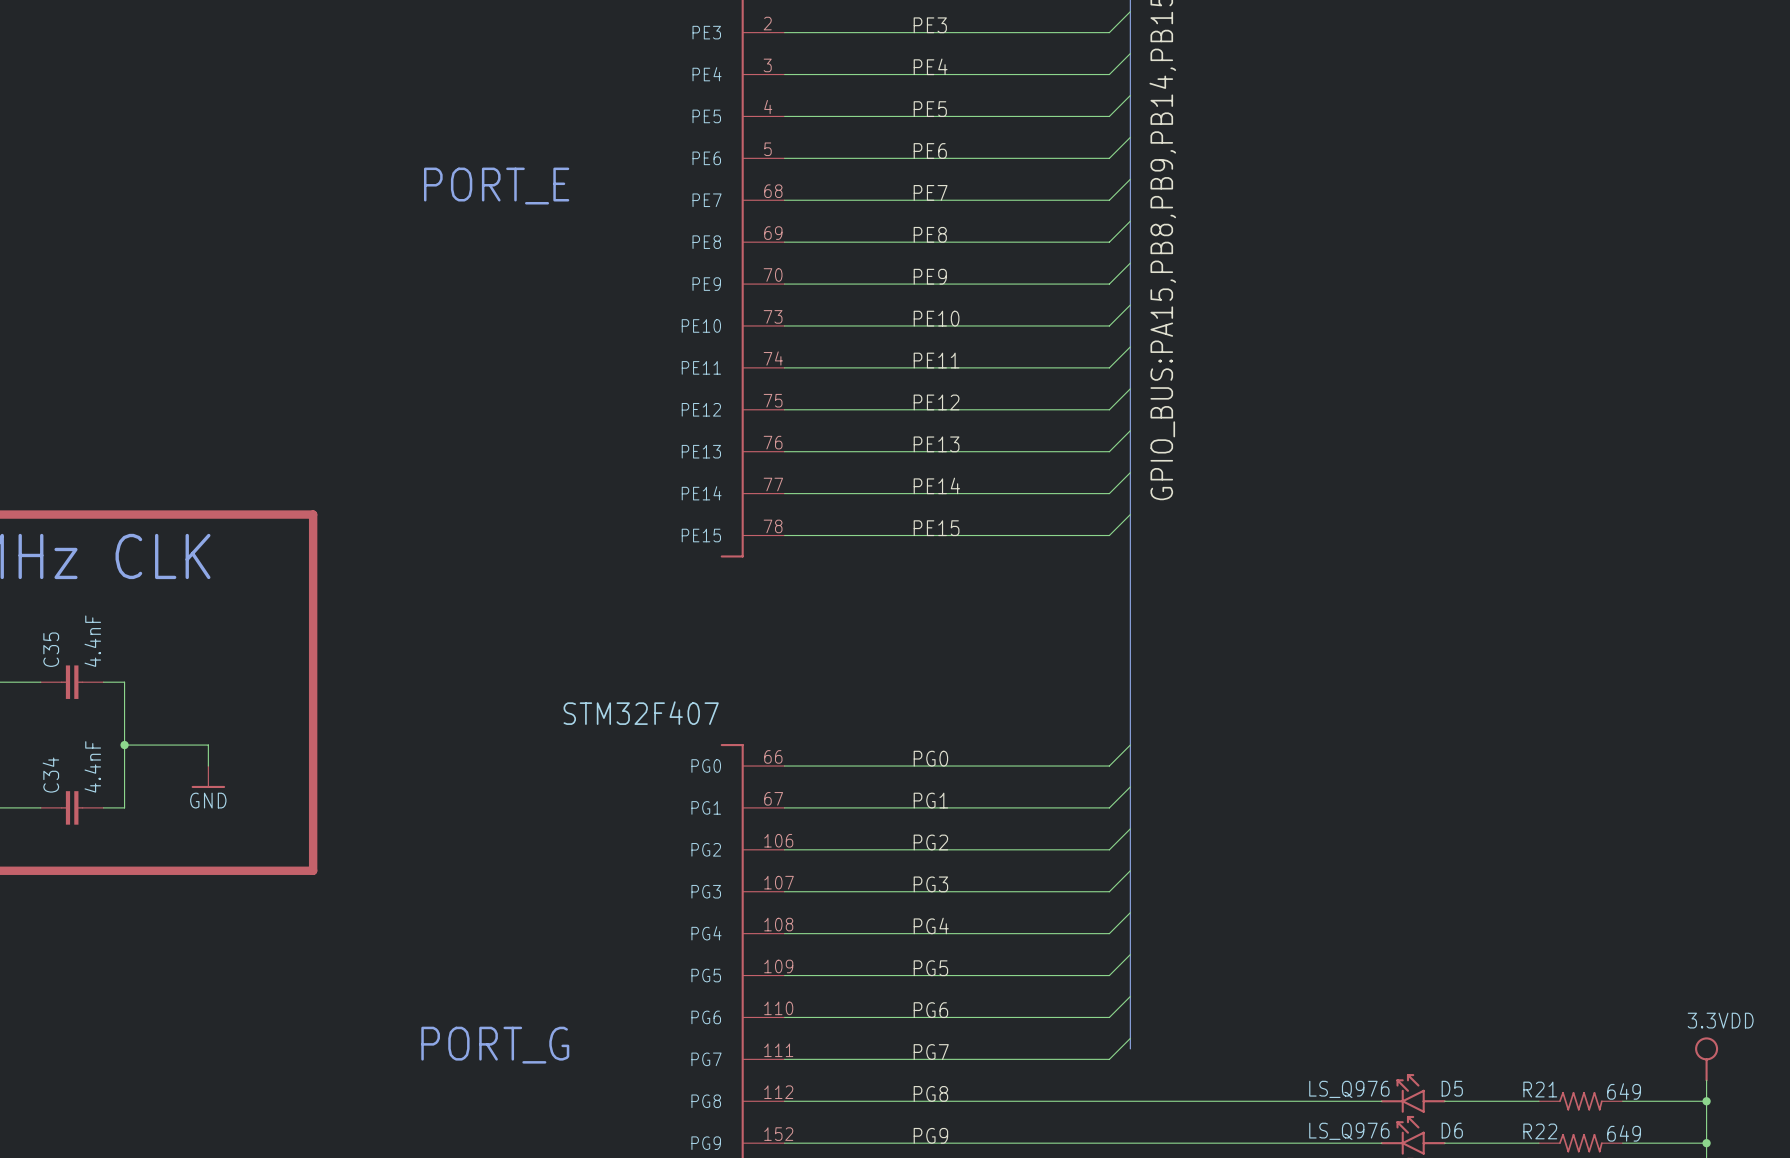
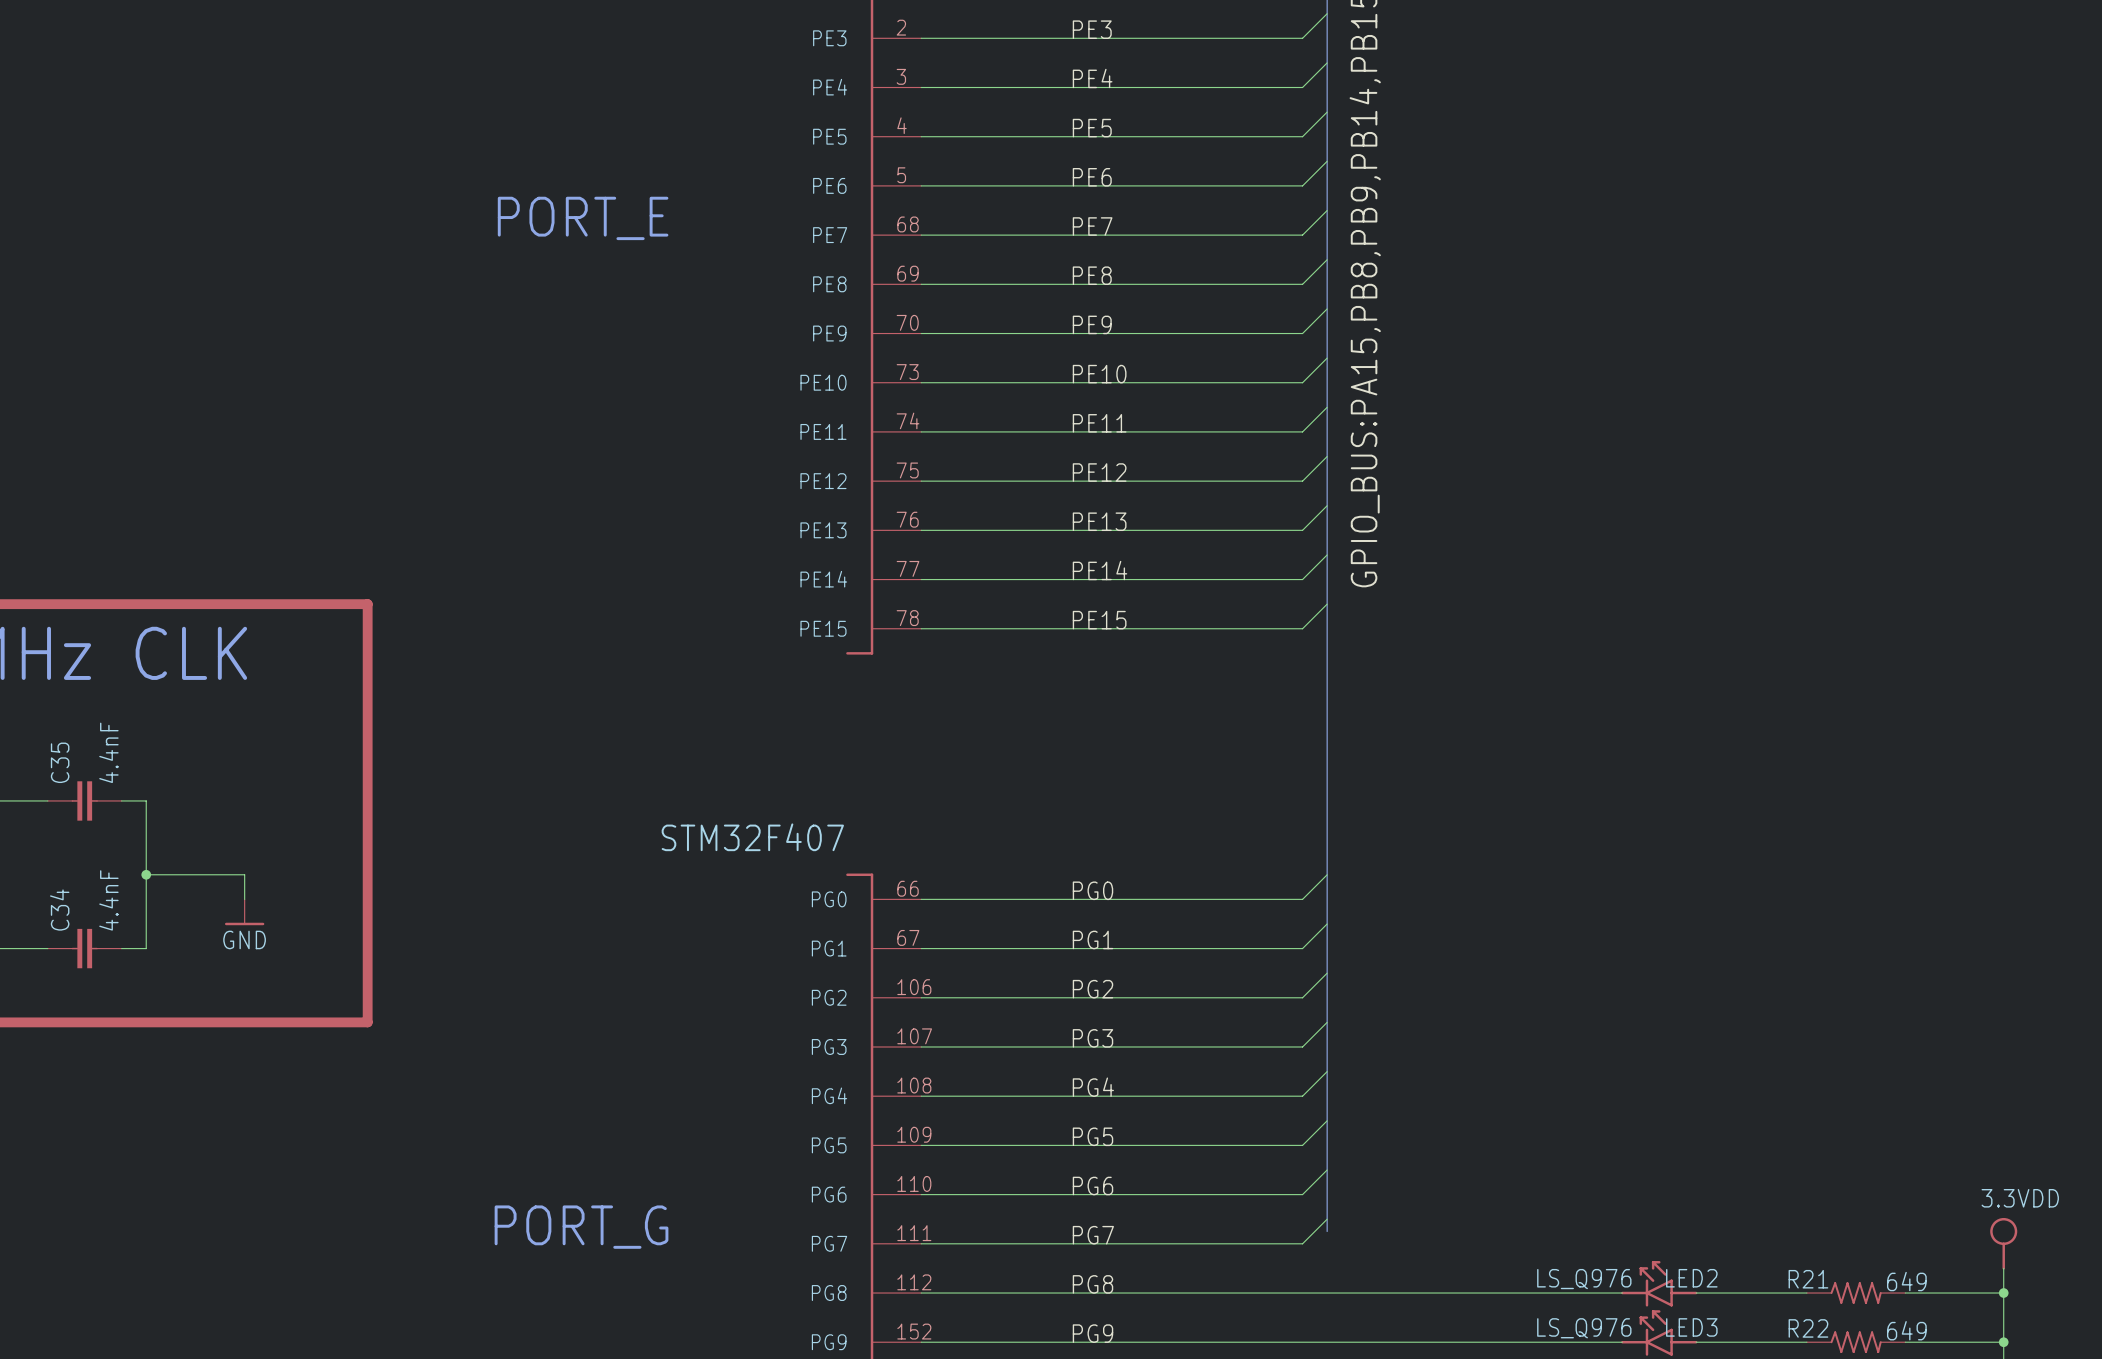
D5 name: D5 (1452, 1088) -> LED2 (1691, 1278)
D6 name: D6 (1452, 1130) -> LED3 (1691, 1327)

